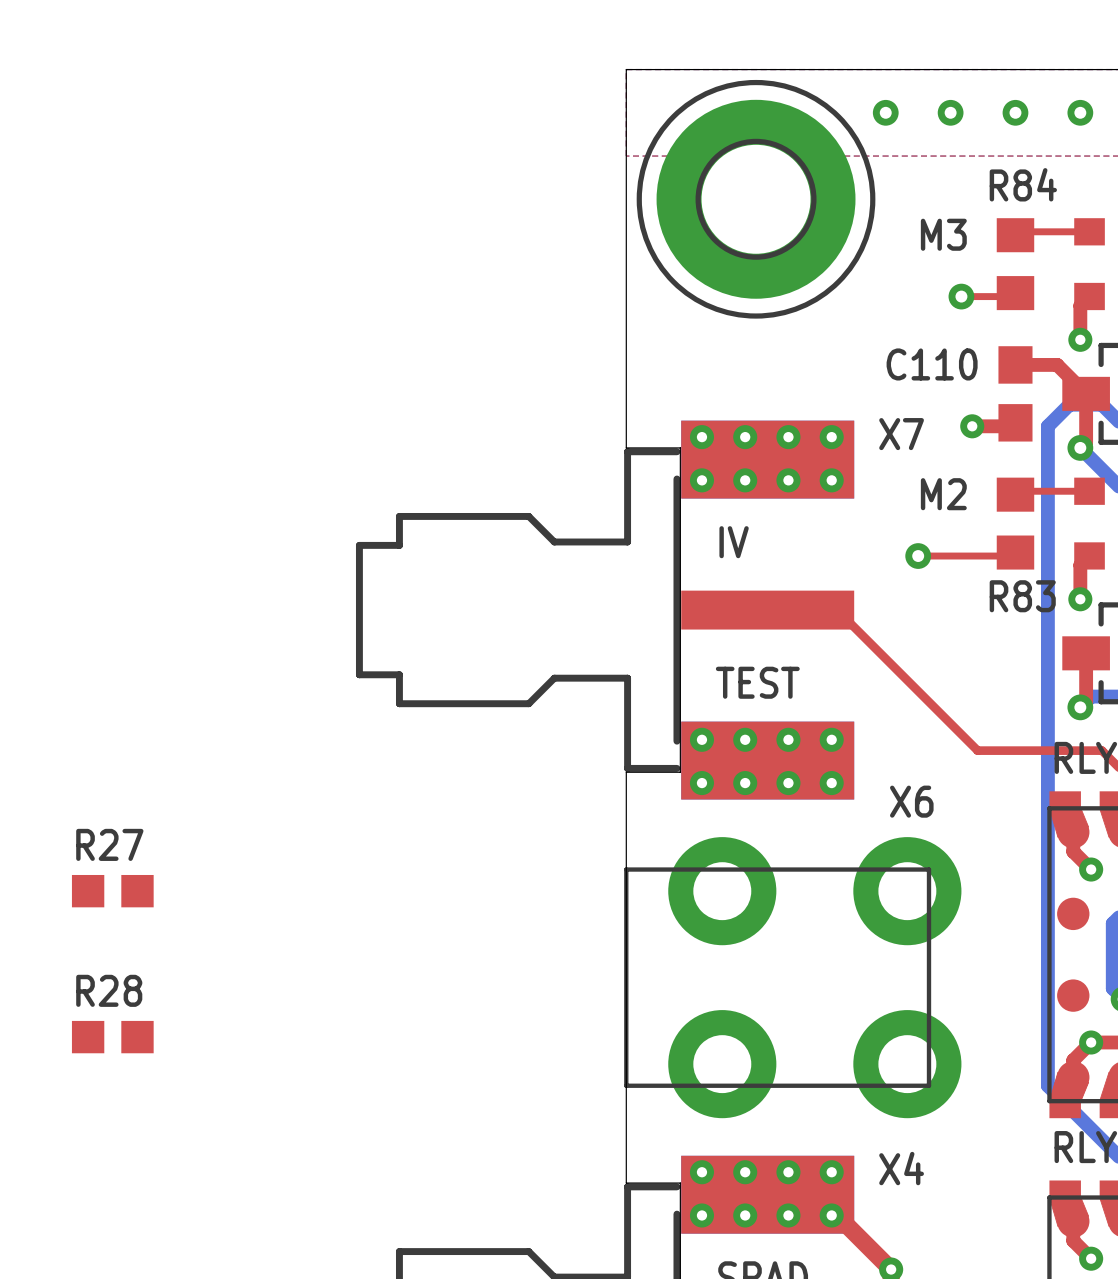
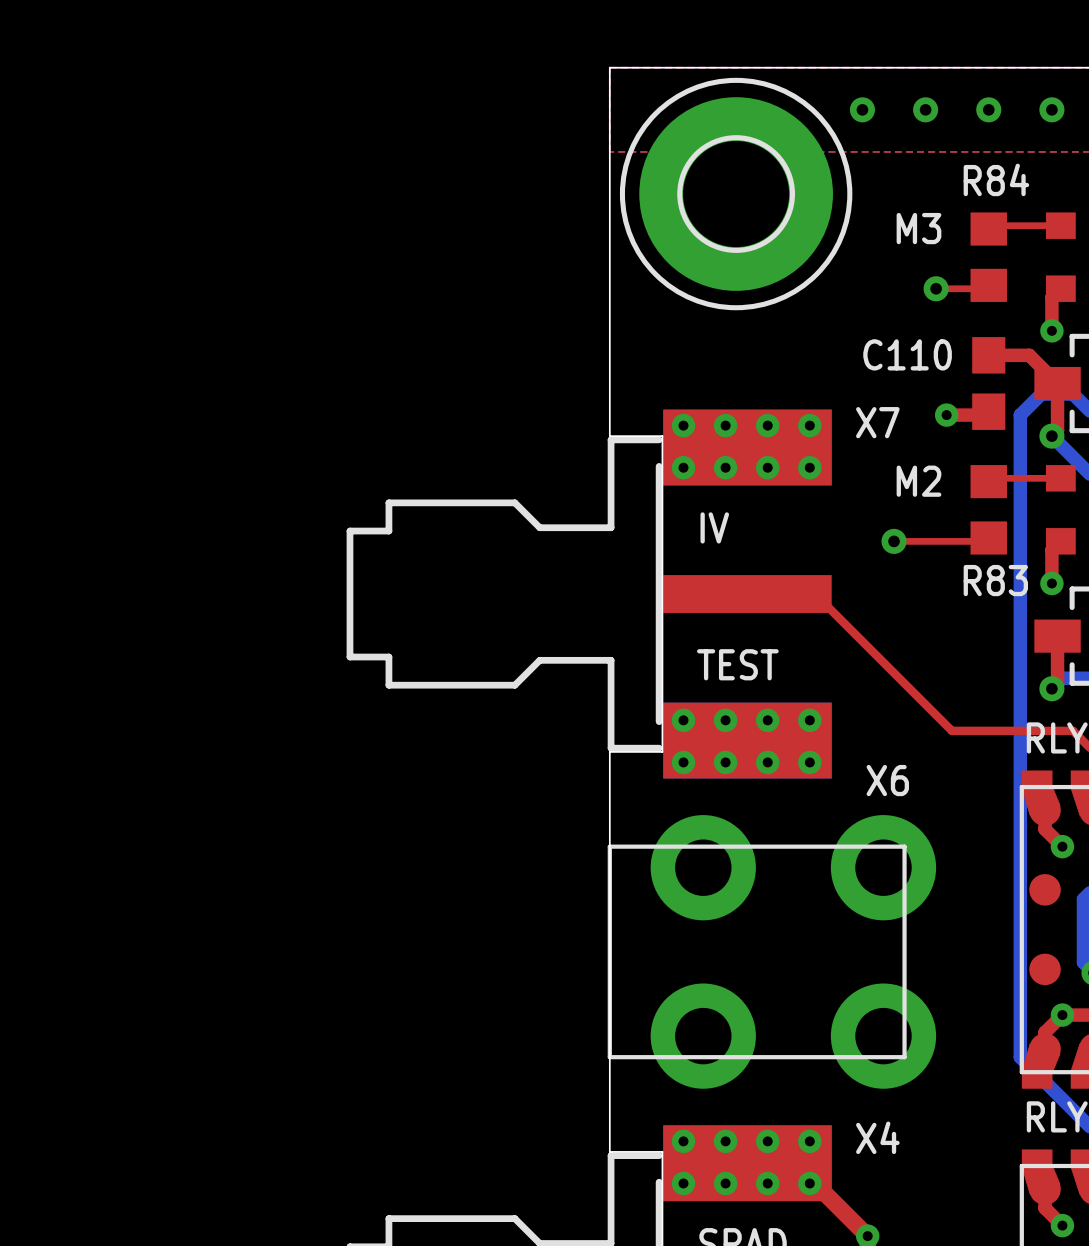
R27: (112, 891) -> none
R28: (112, 1037) -> none

